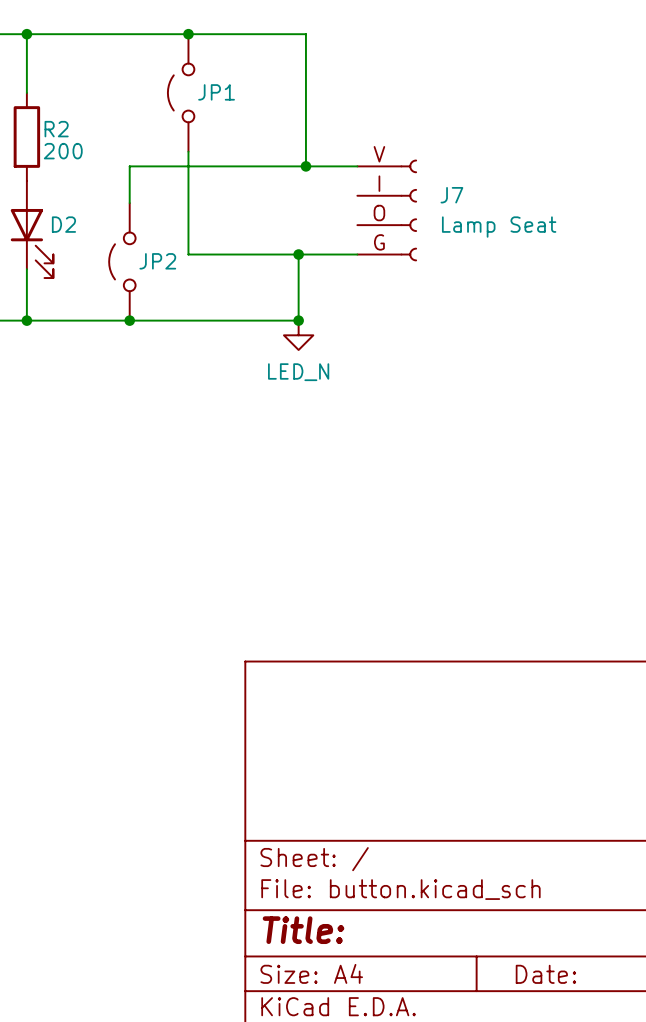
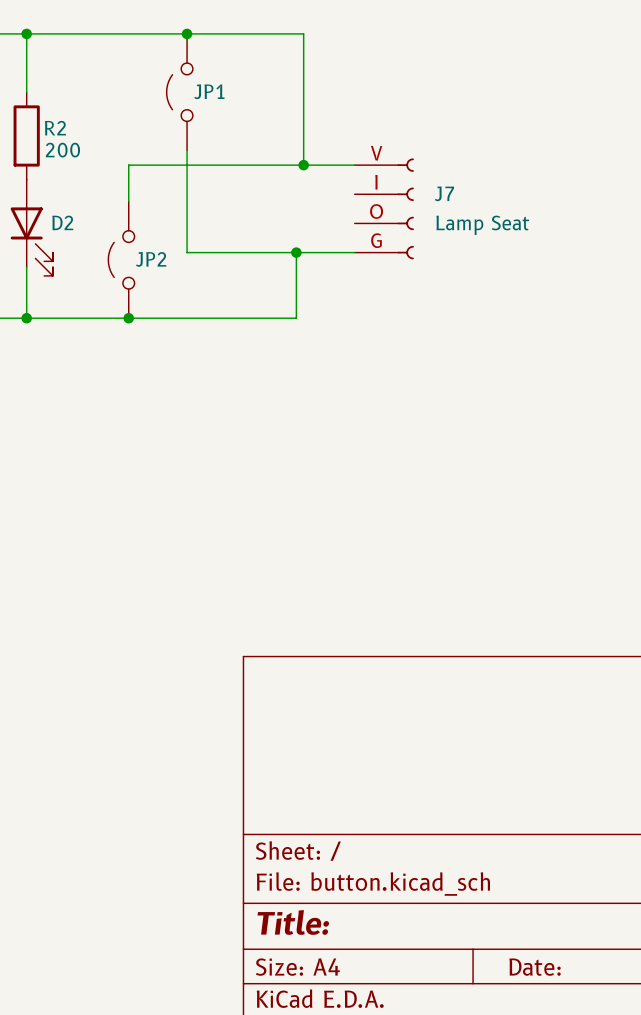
junction: (298, 320) -> none
power symbol: LED_N (298, 335) -> none

